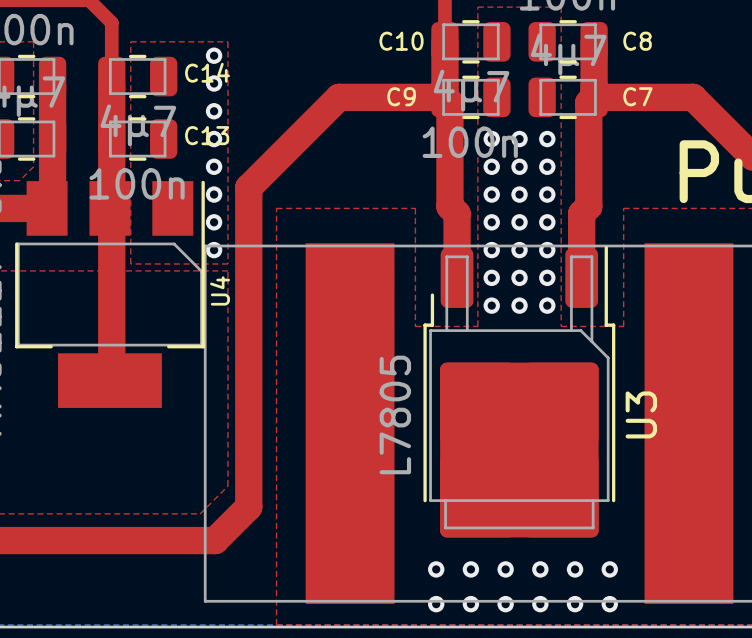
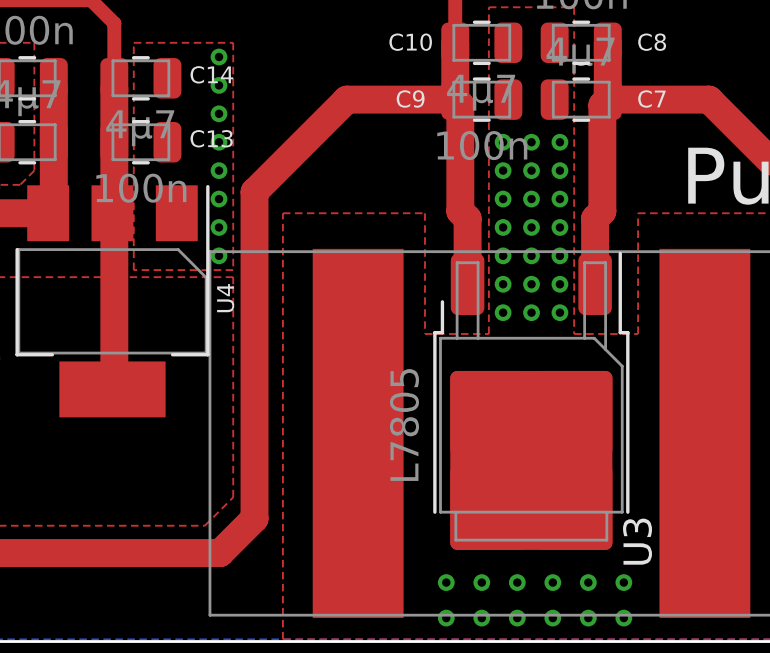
U3 name position: U3 (641, 414) -> U3 (637, 541)

